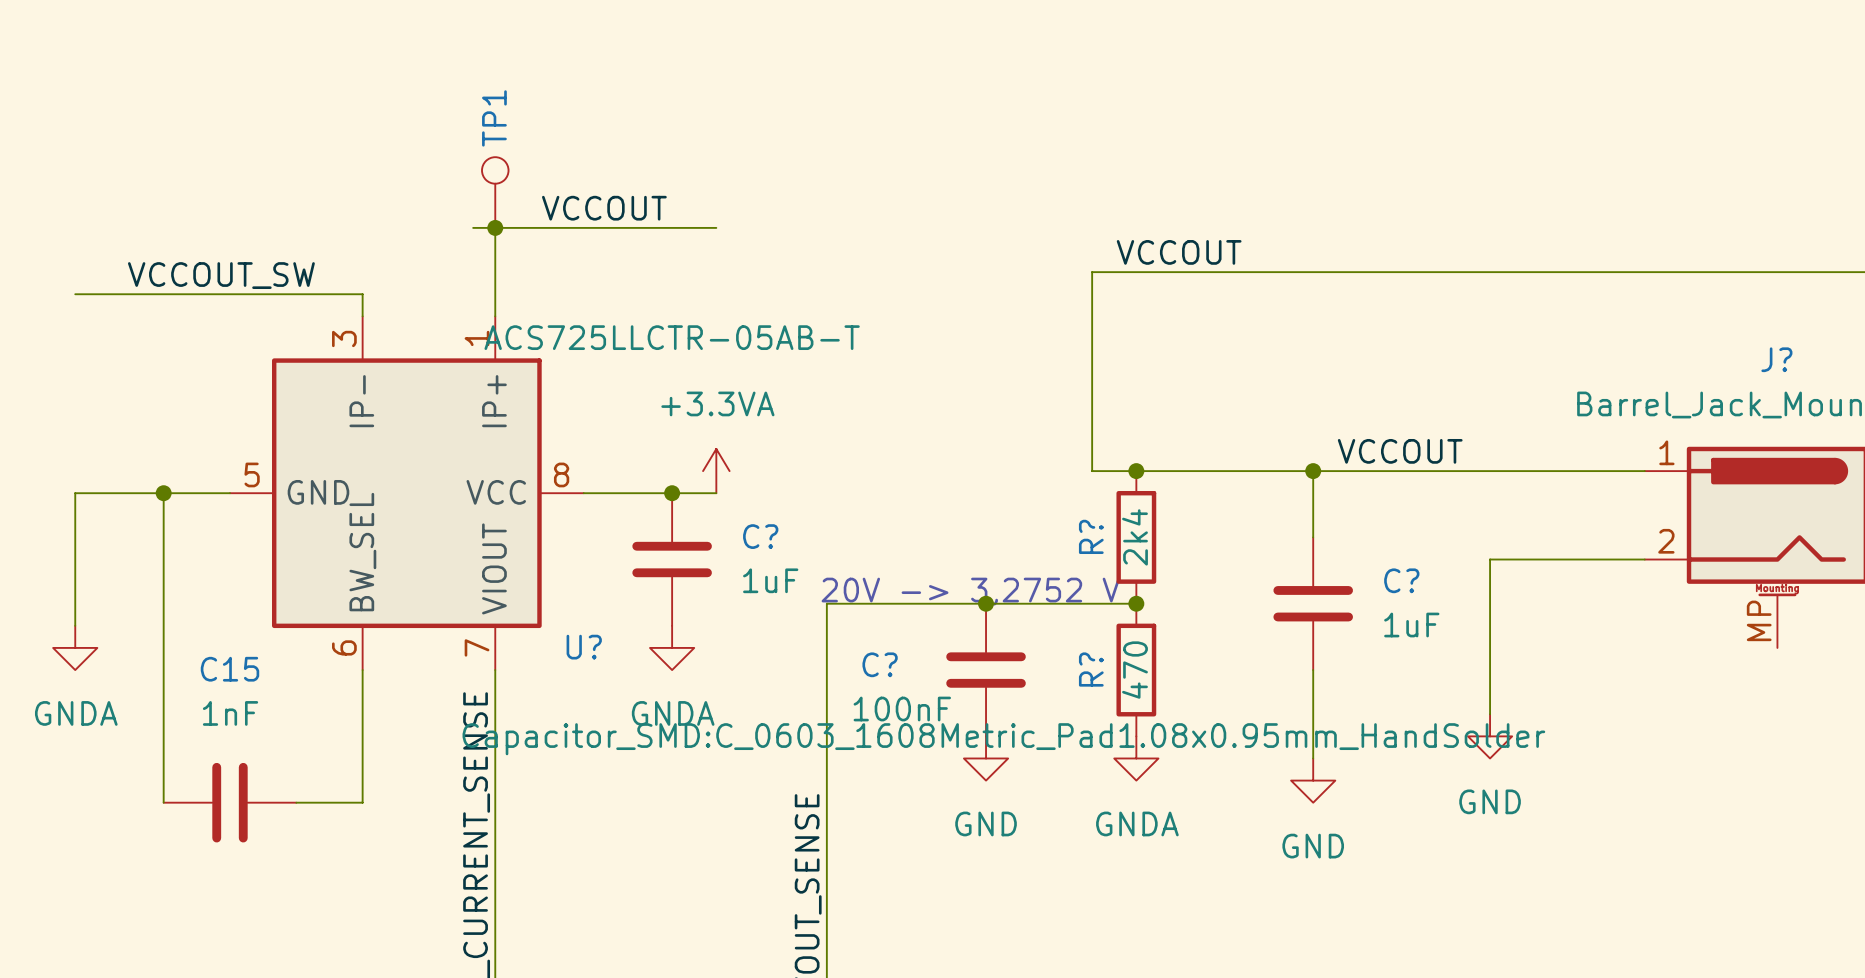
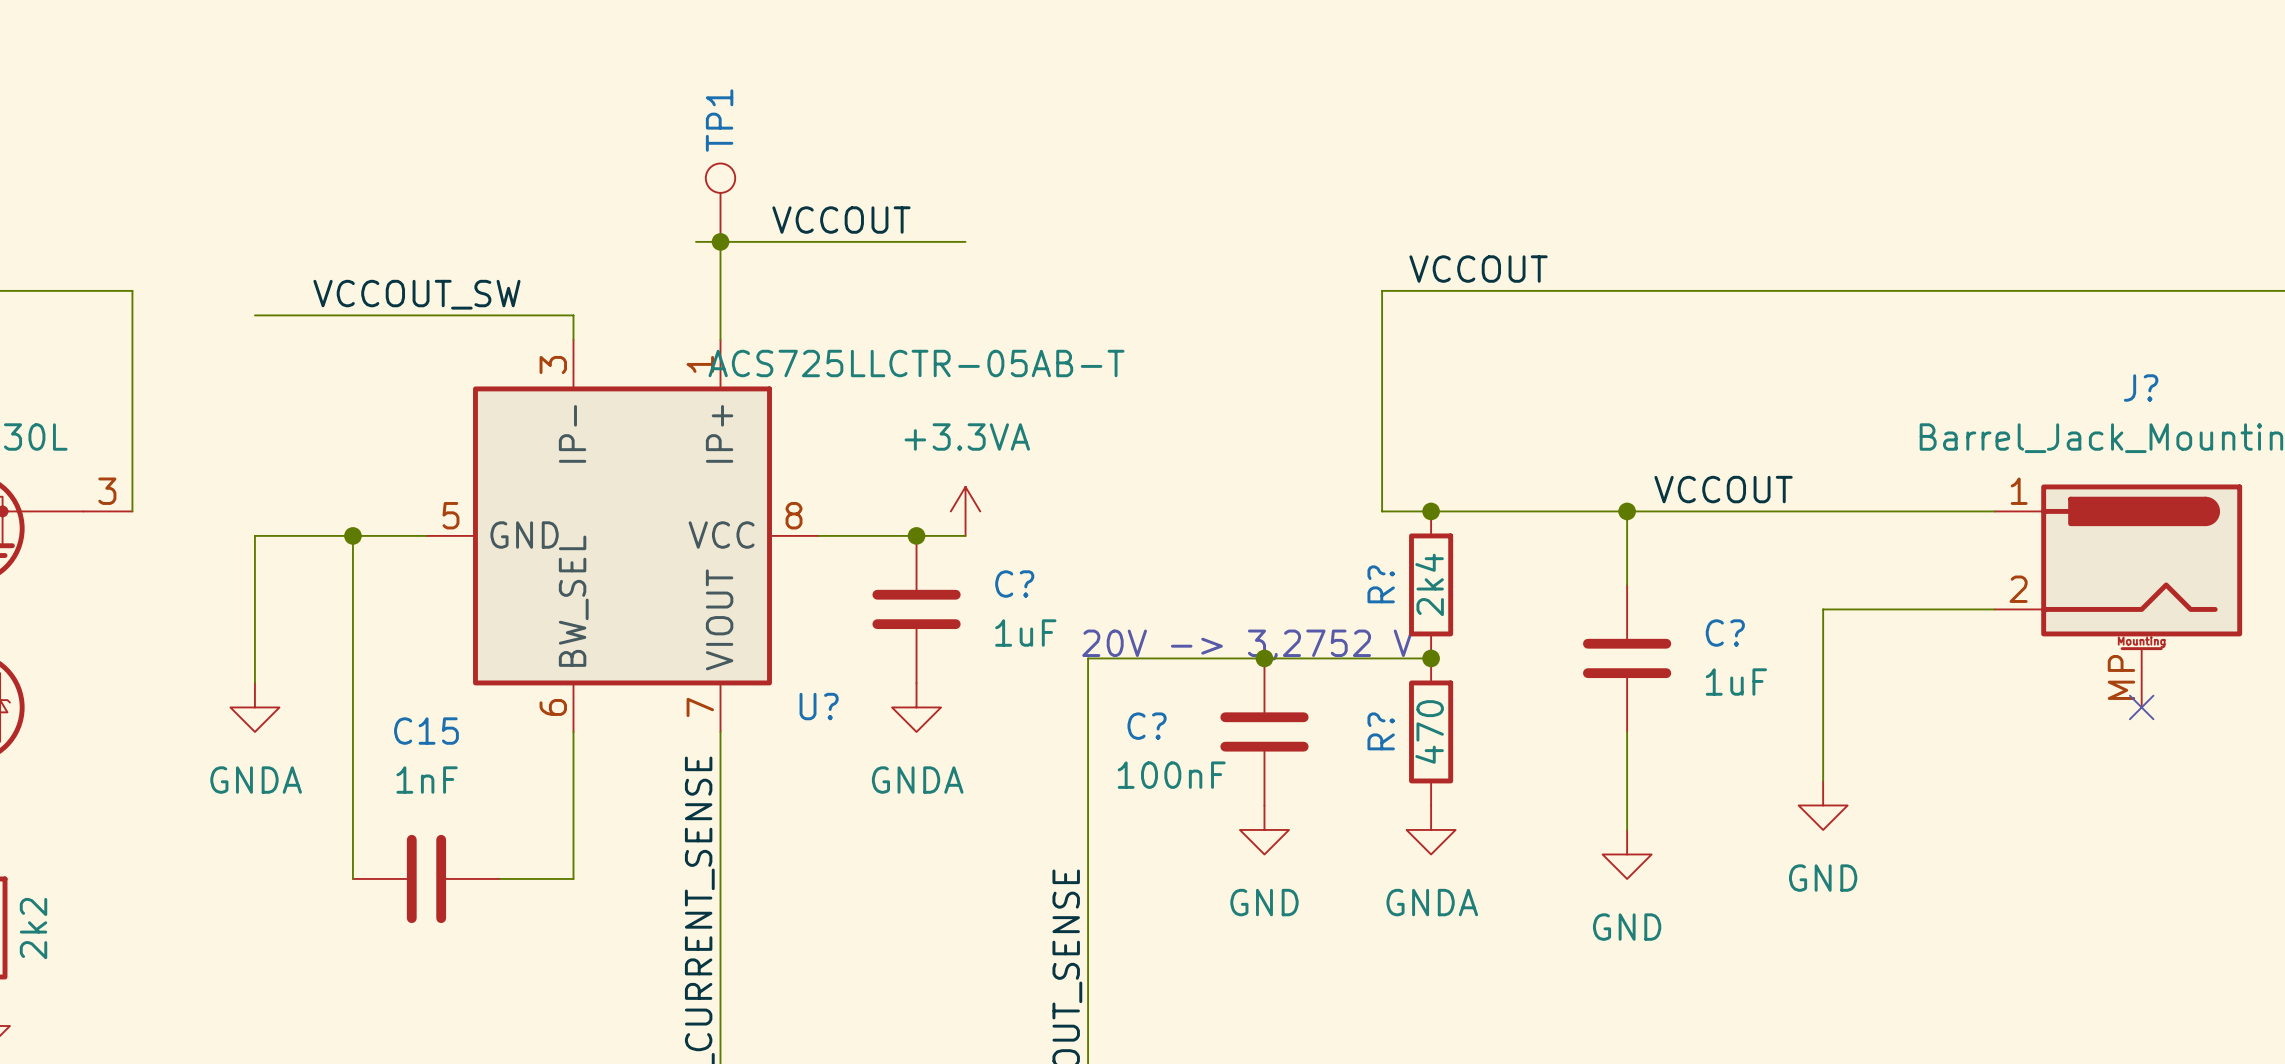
no-connect mark: none -> (2141, 707)
C? text: Capacitor_SMD:C_0603_1608Metric_Pad1.08x0.95mm_HandSolder (1003, 739) -> none

